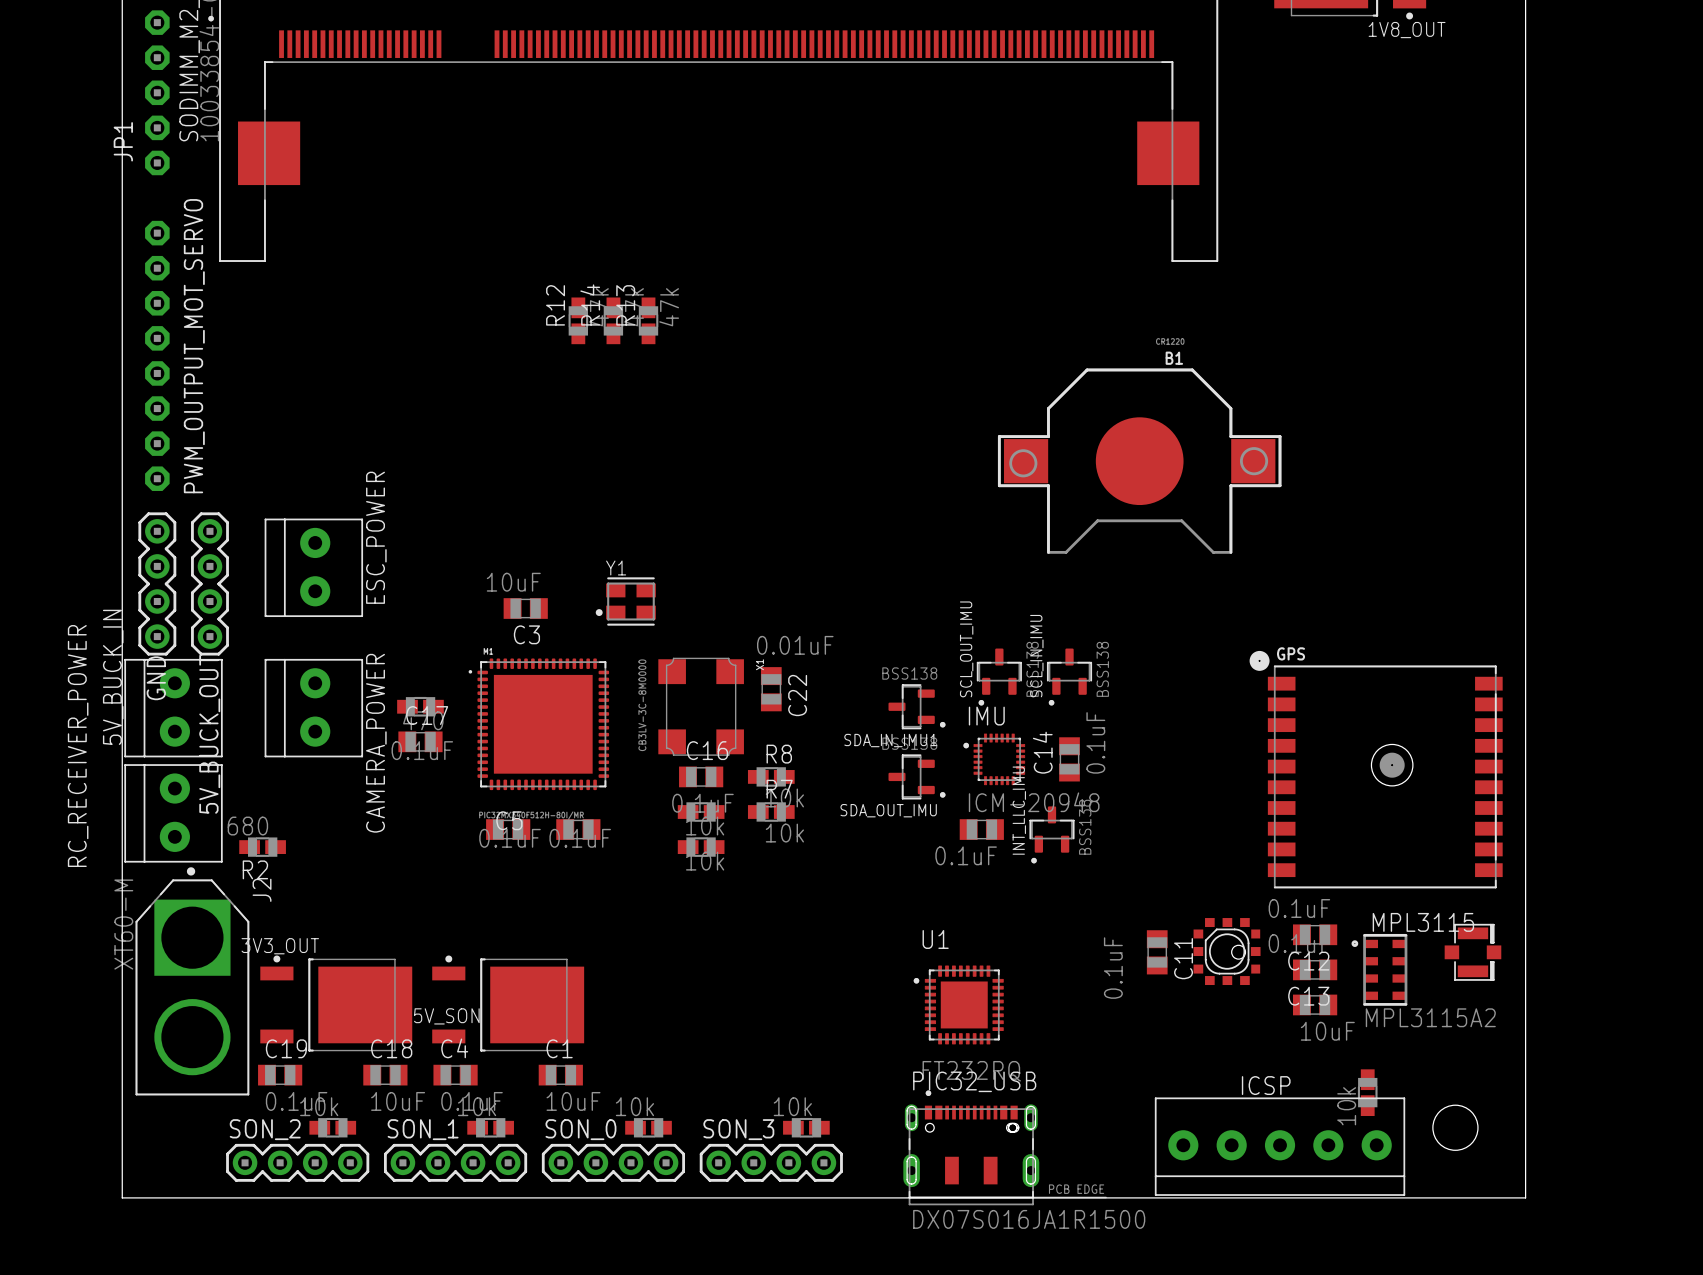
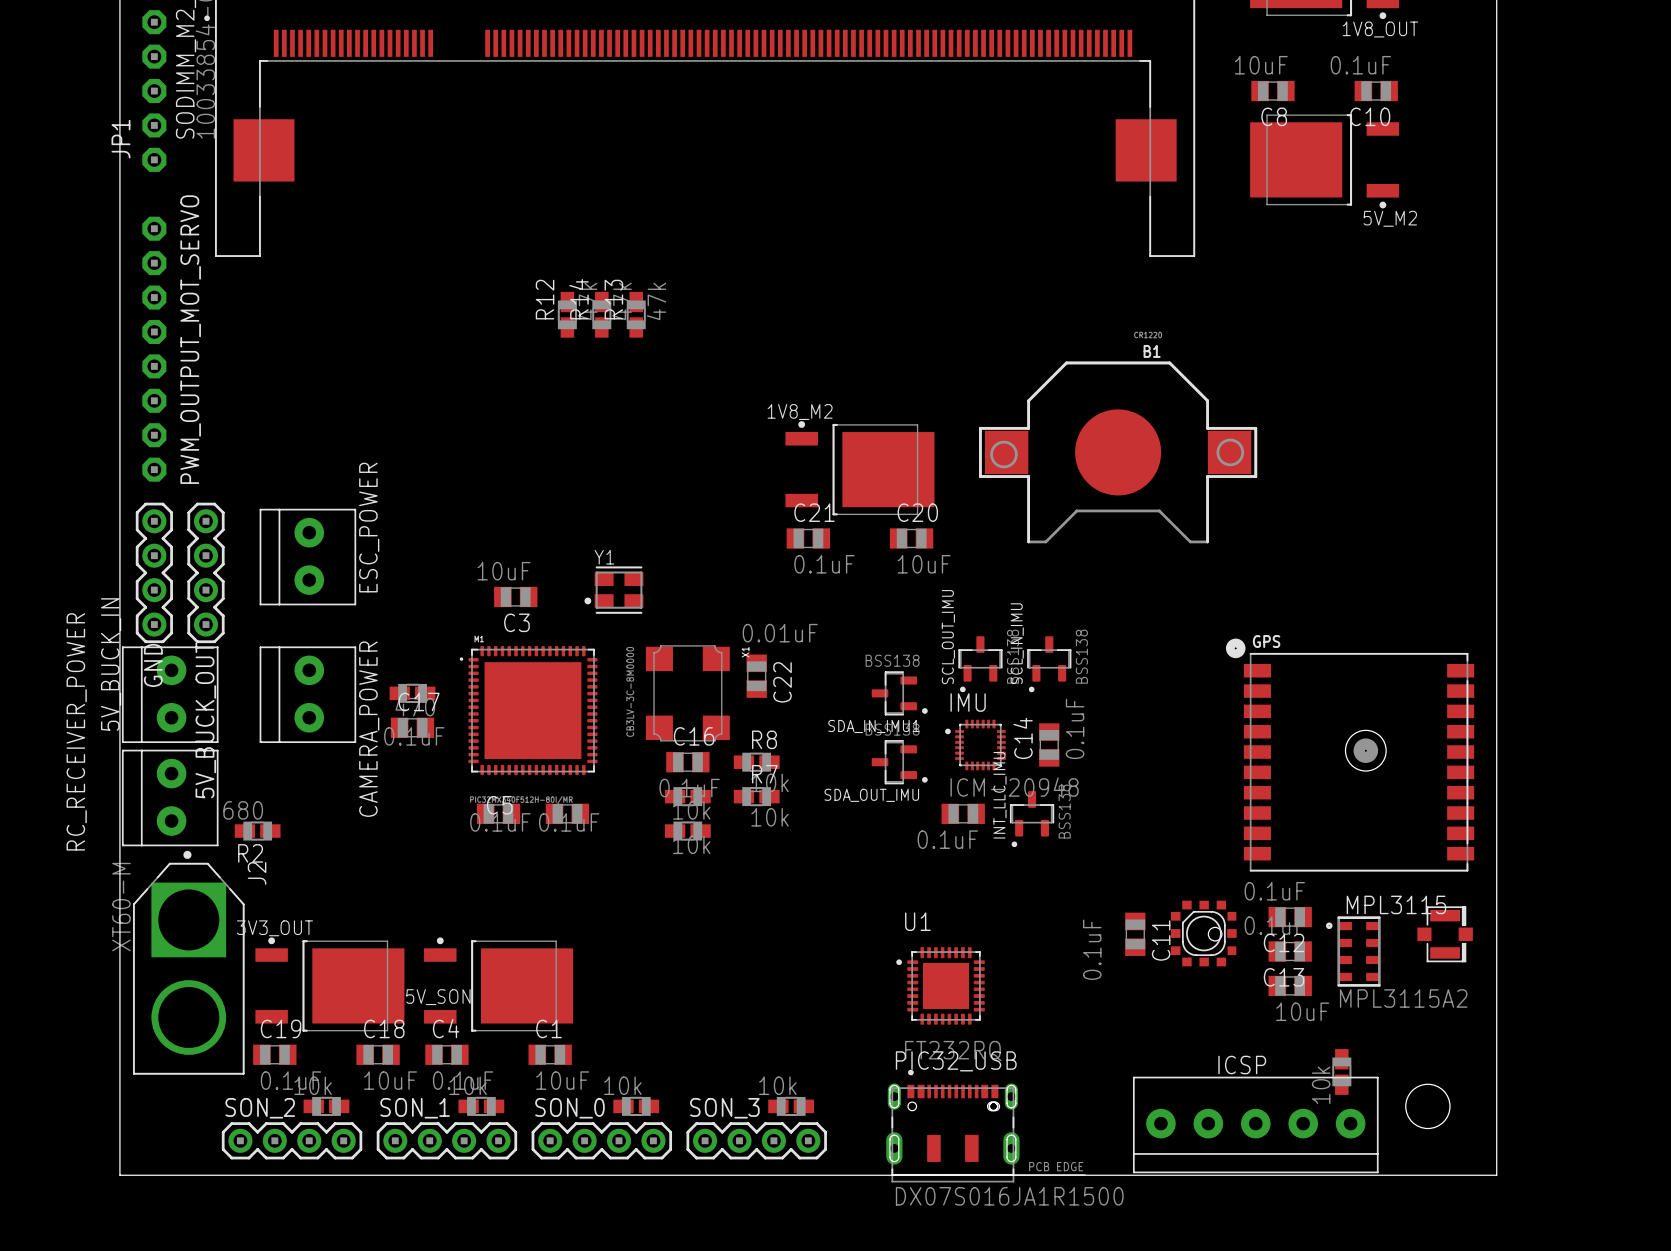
C8: none -> 10uF (1272, 91)
C10: none -> 0.1uF (1376, 91)
5V_M2: none -> (1324, 161)
1V8_M2: none -> (859, 468)
C21: none -> 0.1uF (808, 538)
C20: none -> 10uF (911, 538)

